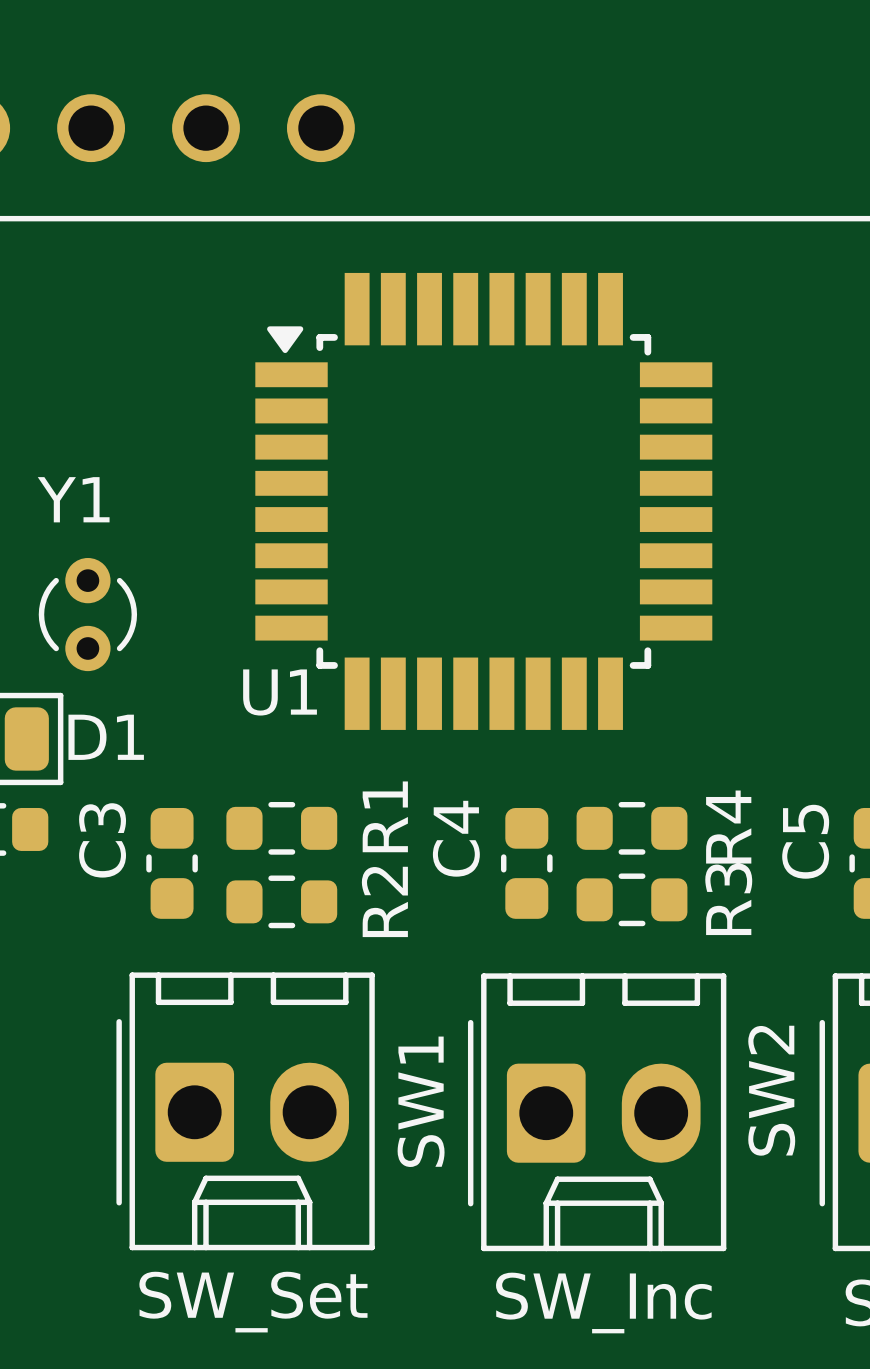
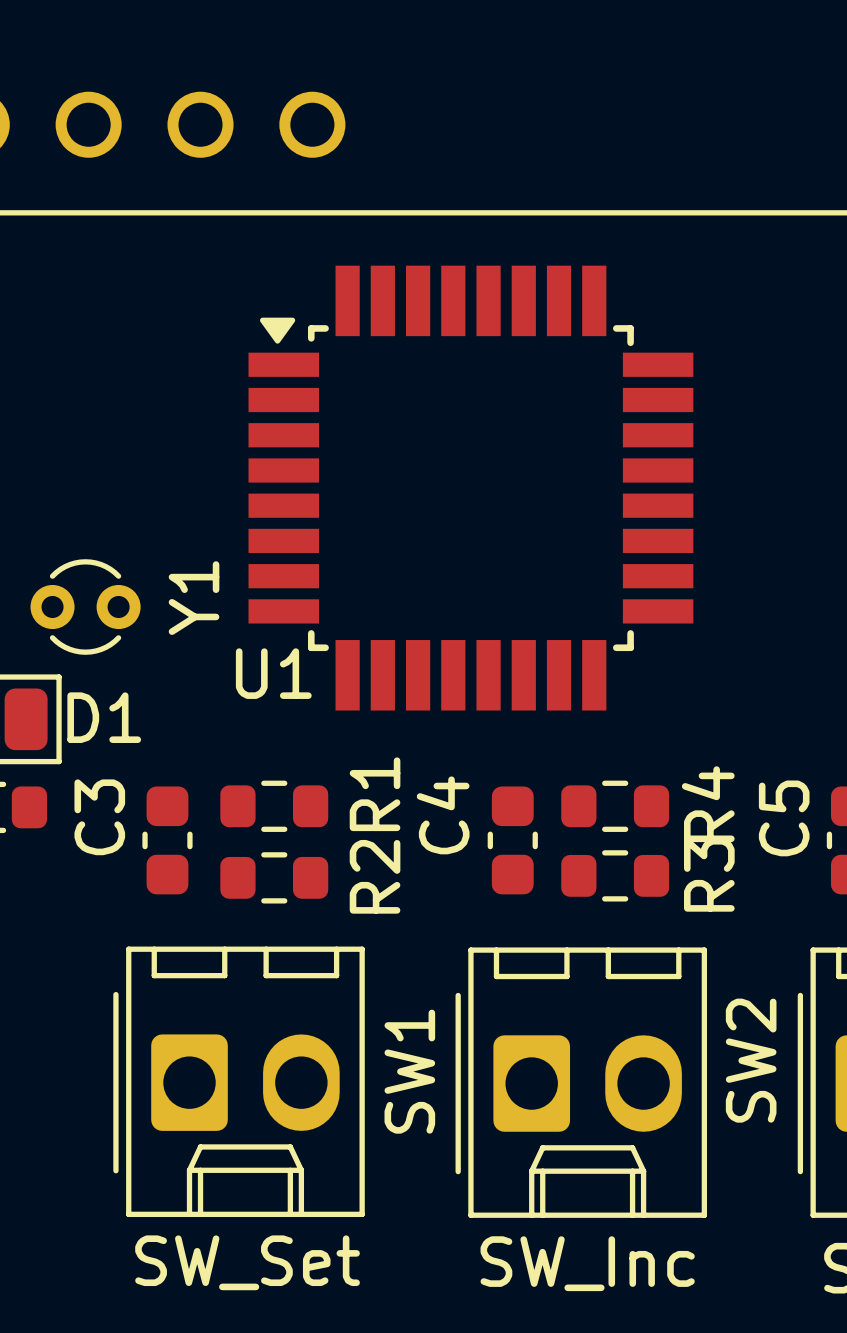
Y1 rotation: 0° (87, 614) -> 90° clockwise (85, 607)

